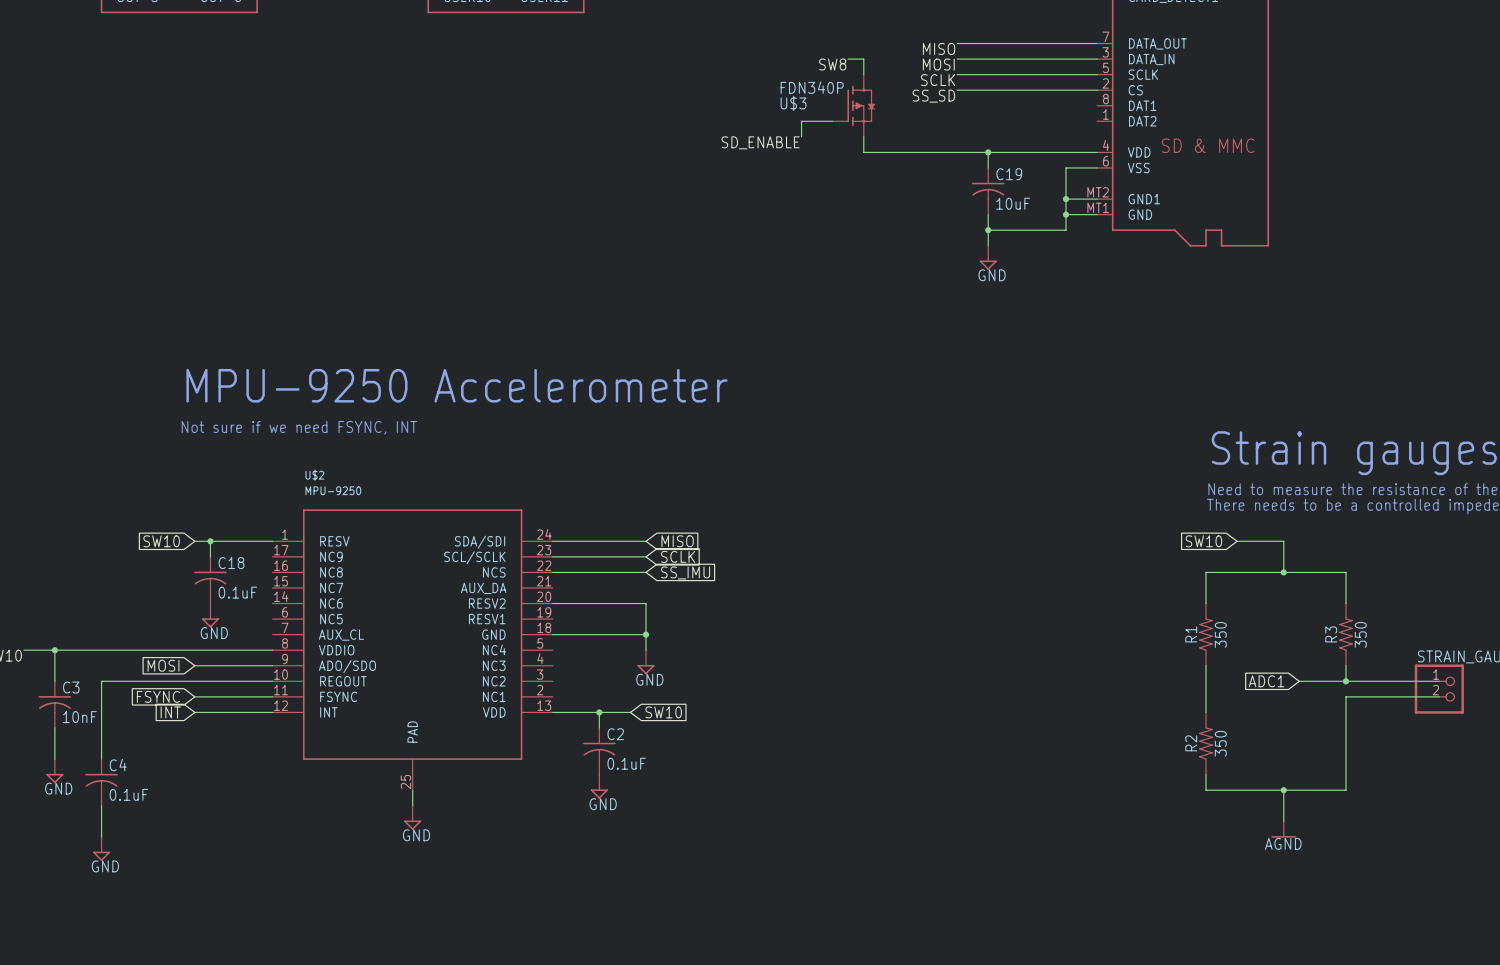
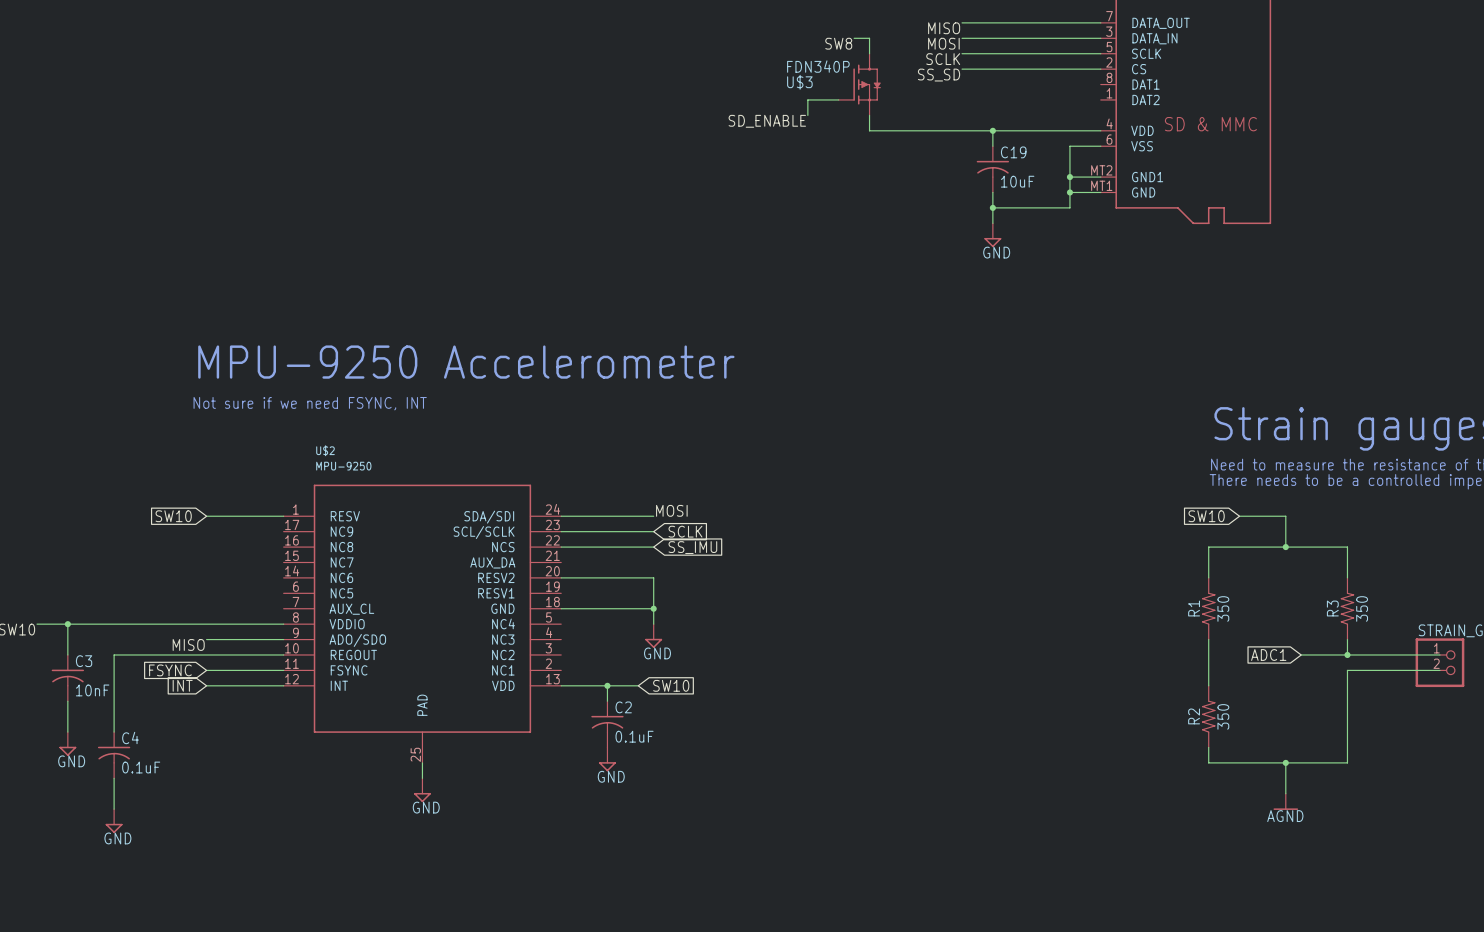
label: none -> MOSI (671, 510)
wire: (210, 541) (210, 556) -> none
junction: (210, 541) -> none
global label: MISO (677, 541) -> none
C18: 0.1uF (210, 580) -> none
power symbol: GND (210, 615) -> none
global label: MOSI (163, 665) -> none
label: none -> MISO (188, 644)

